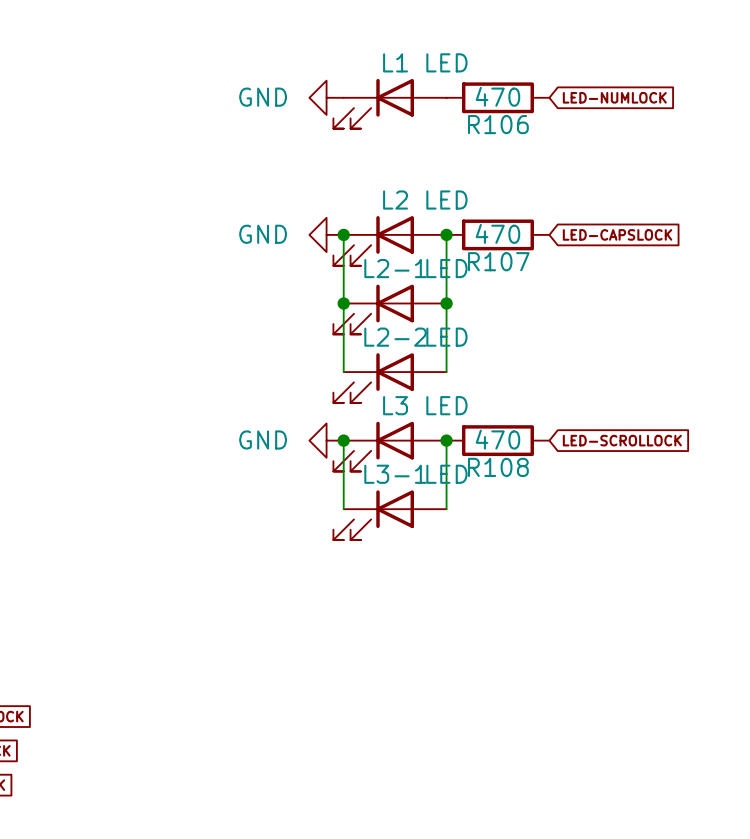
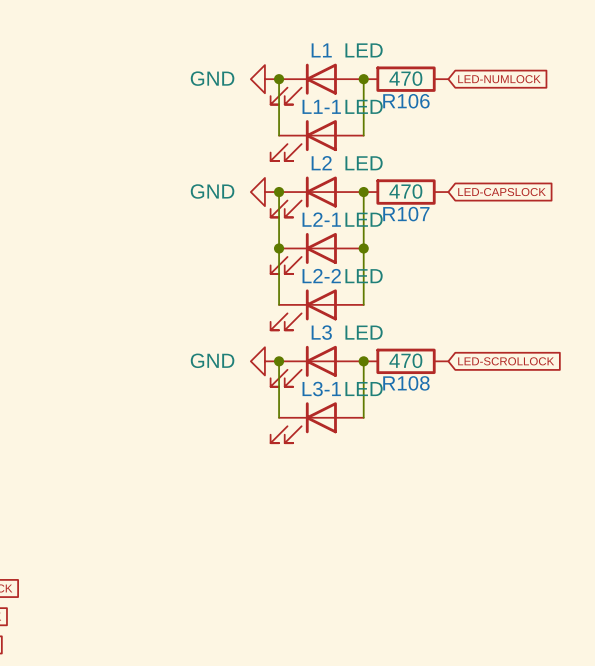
wire: none -> (279, 79) (279, 135)
junction: none -> (279, 79)
wire: none -> (363, 79) (363, 135)
junction: none -> (363, 79)
L1-1: none -> LED (317, 140)

